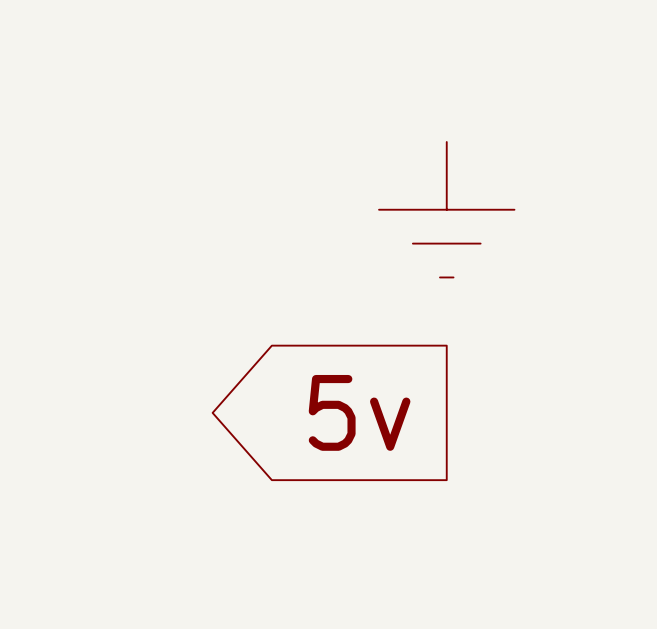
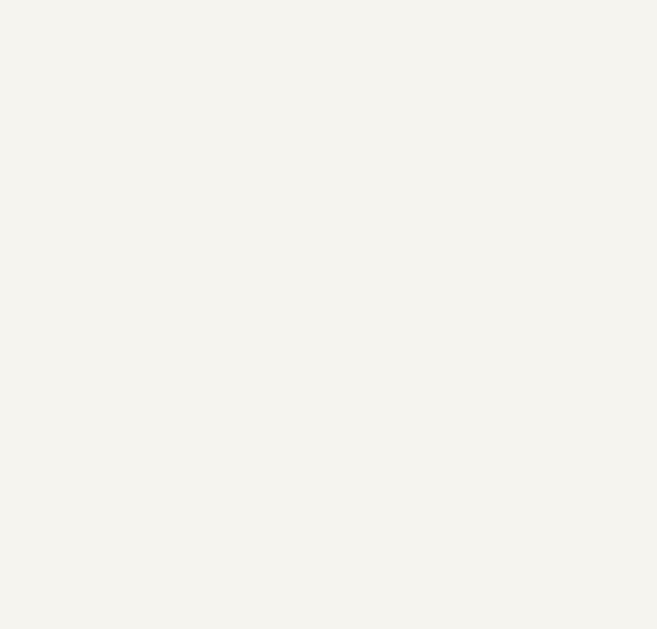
power symbol: (446, 209) -> none
global label: 5v (359, 412) -> none

